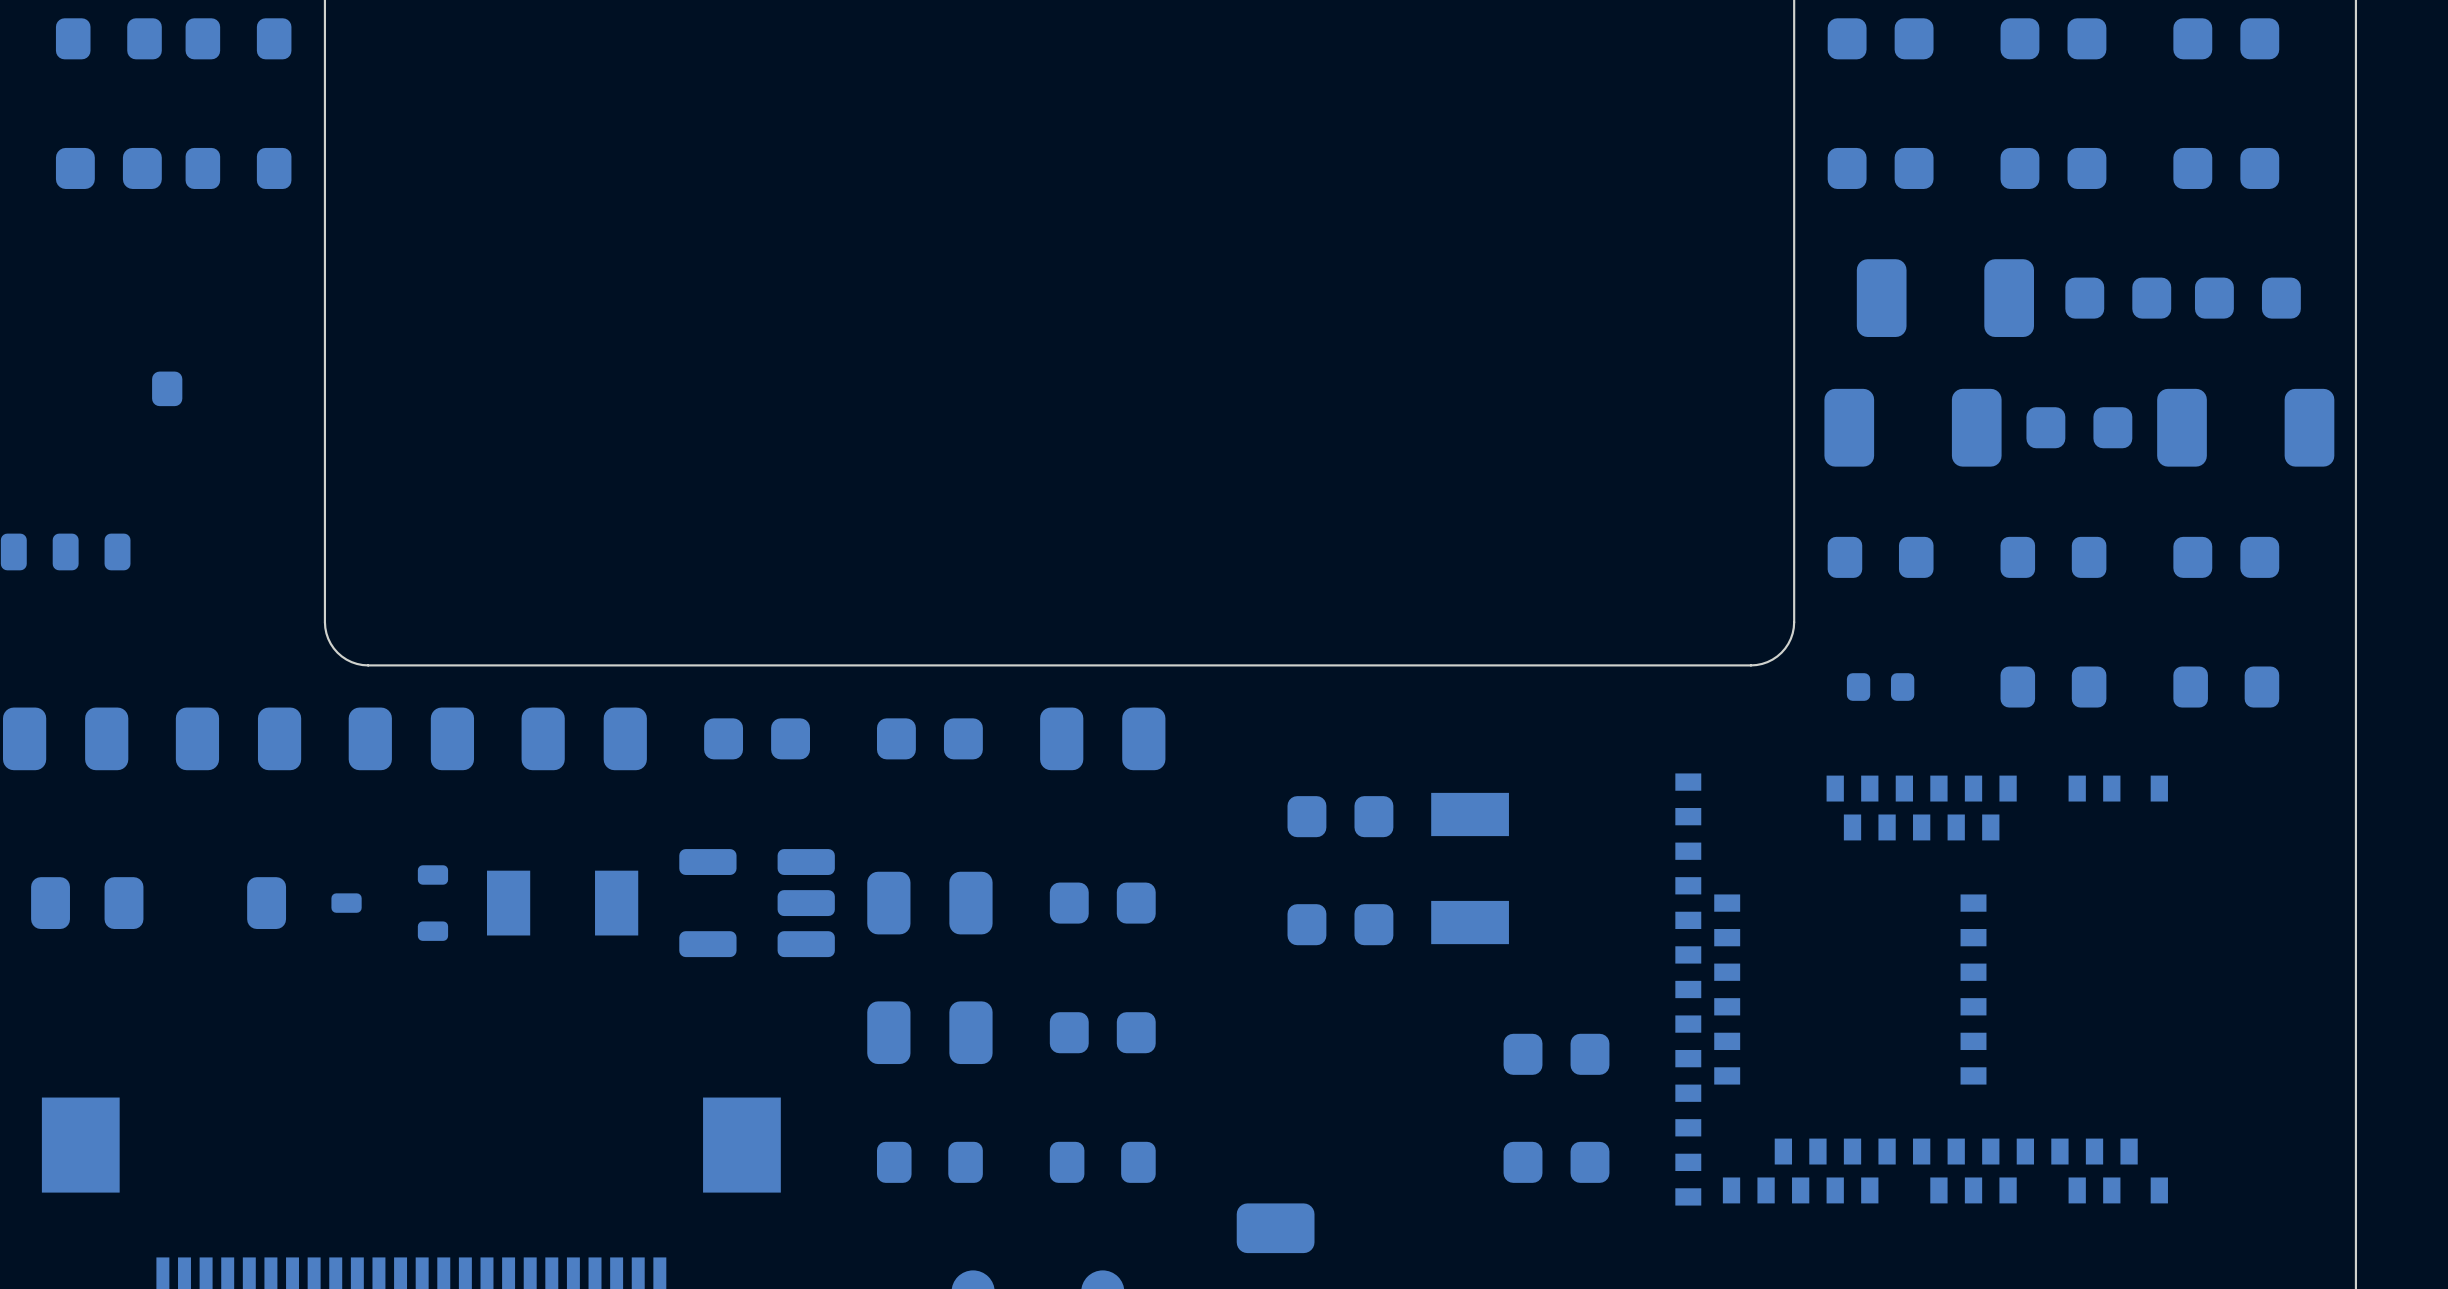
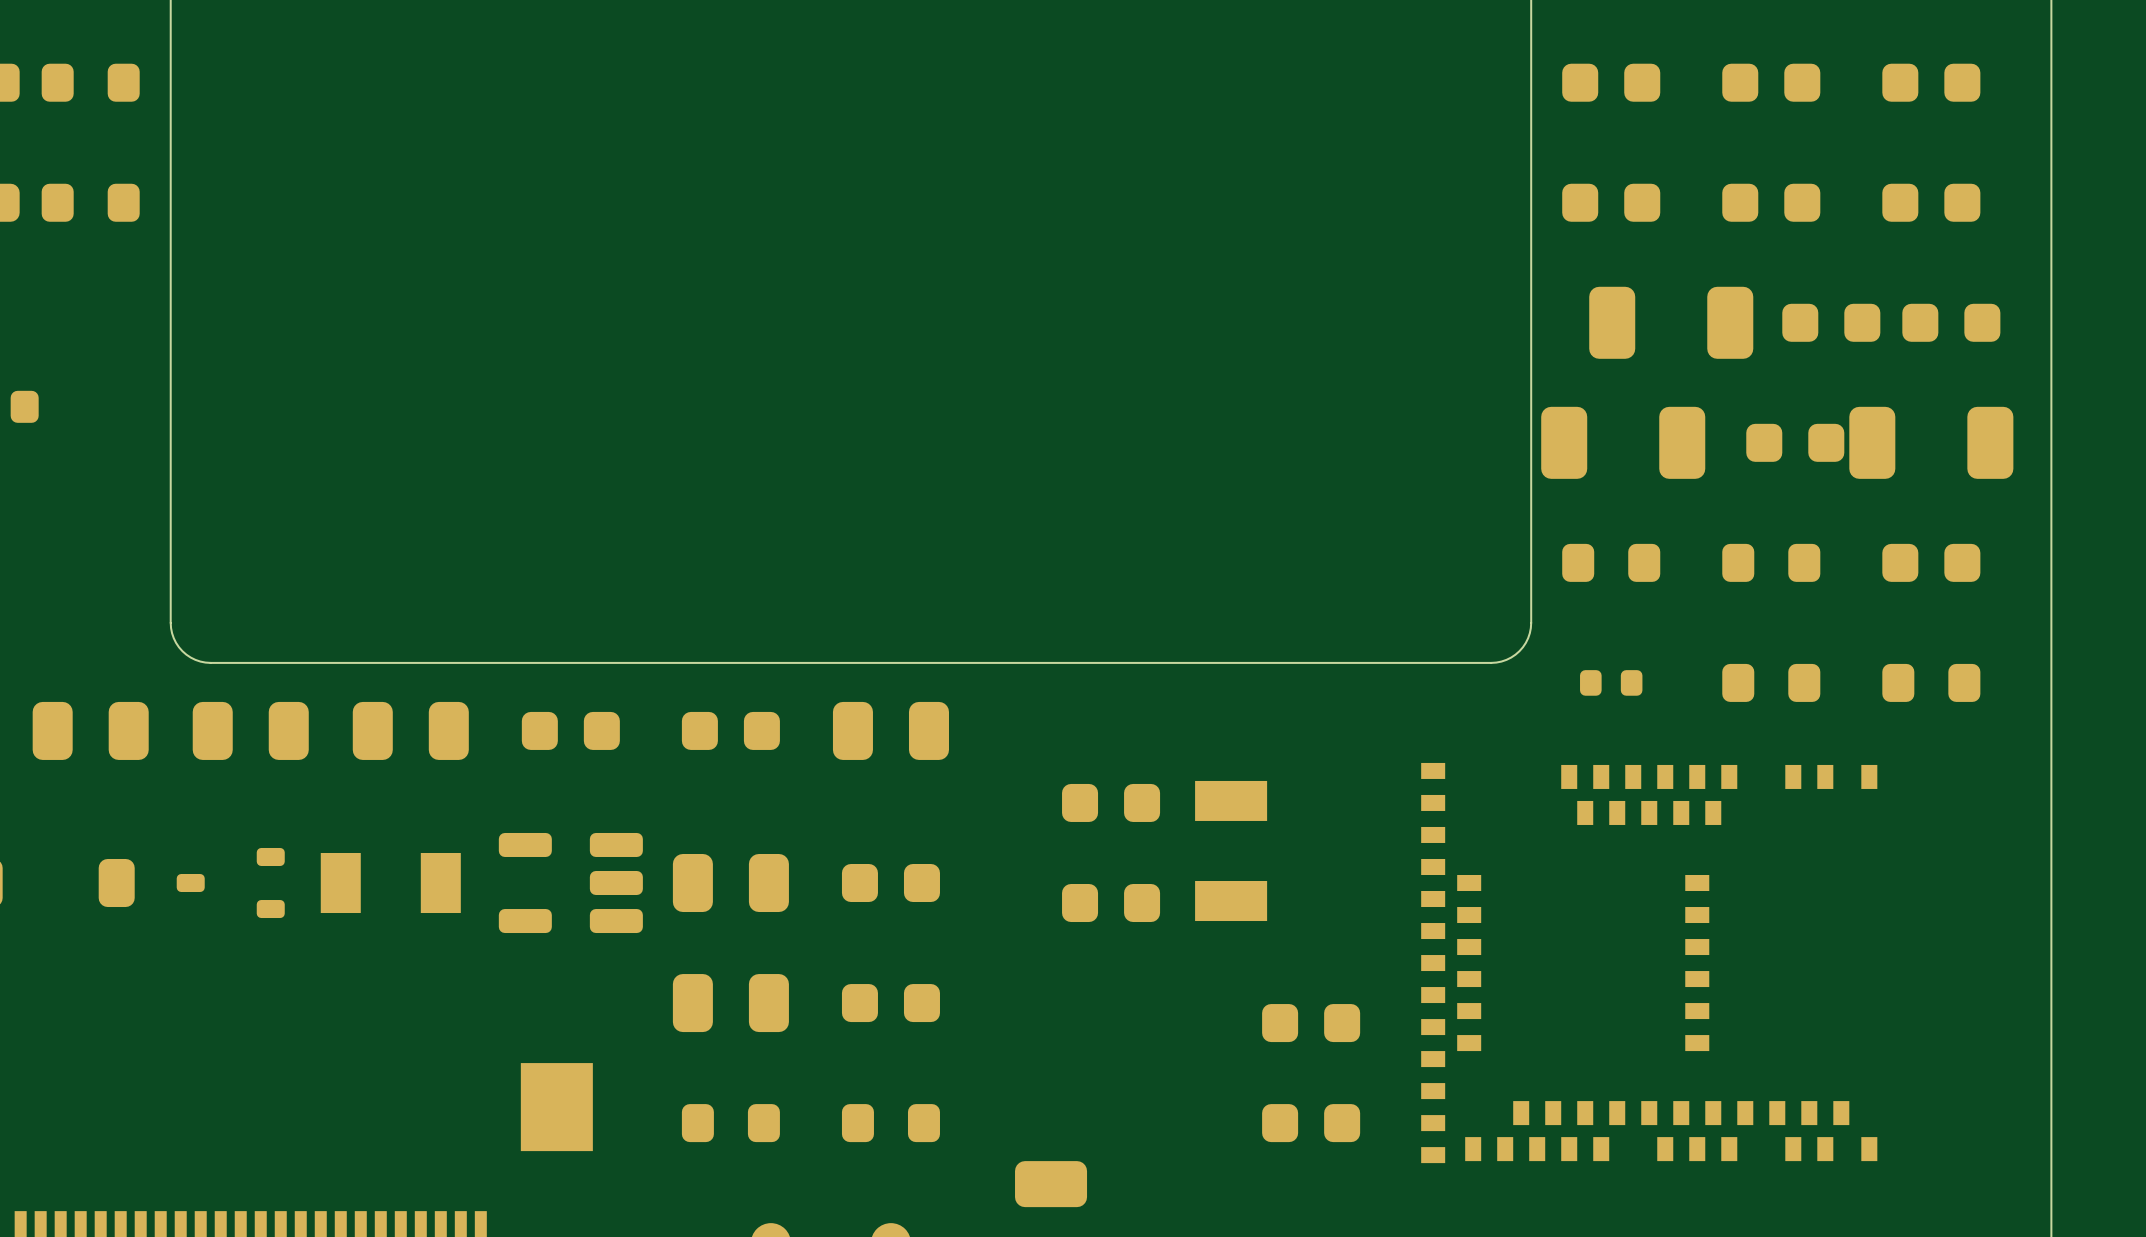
part position: (1913, 427) -> (1623, 442)
part position: (2245, 427) -> (1931, 442)

